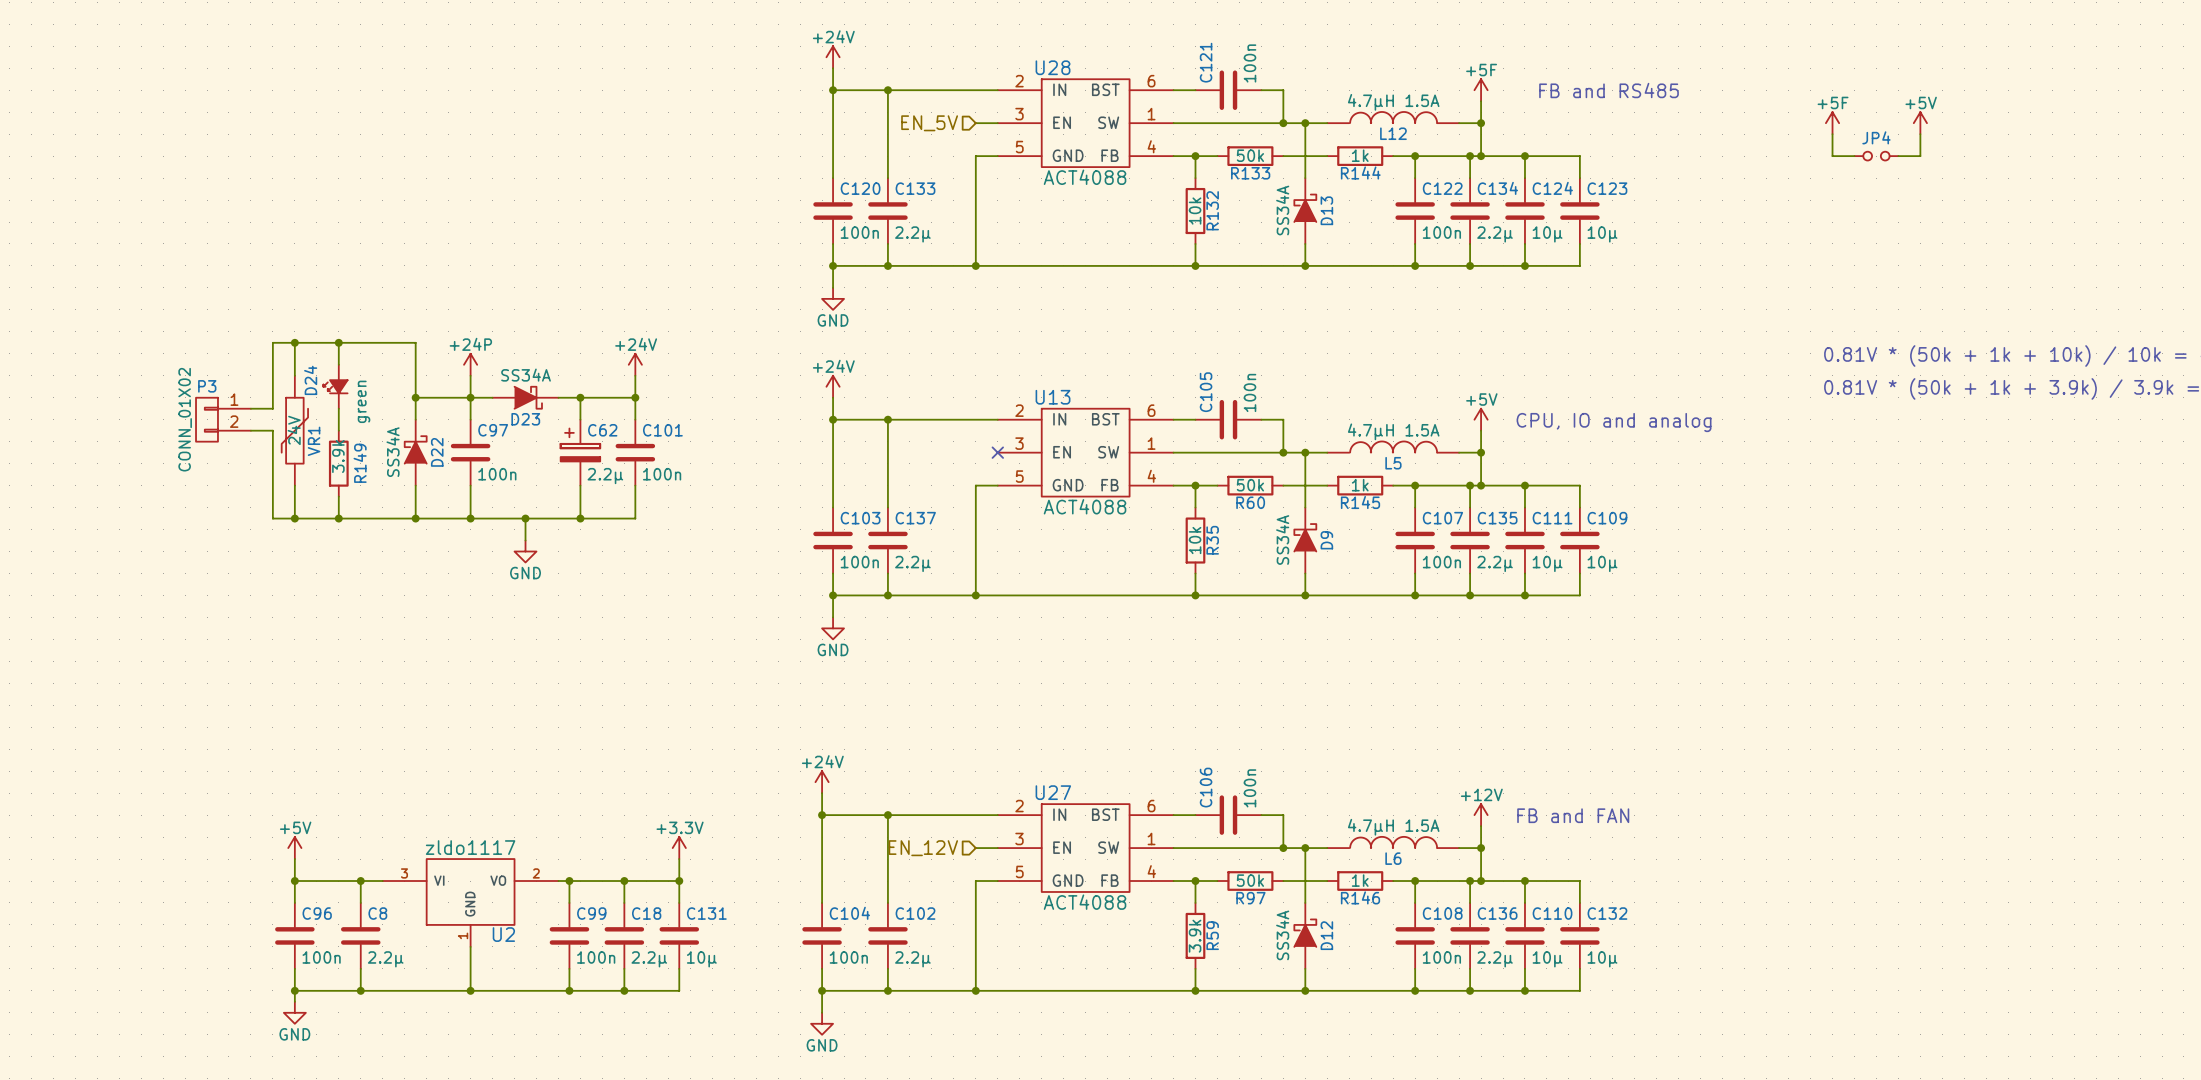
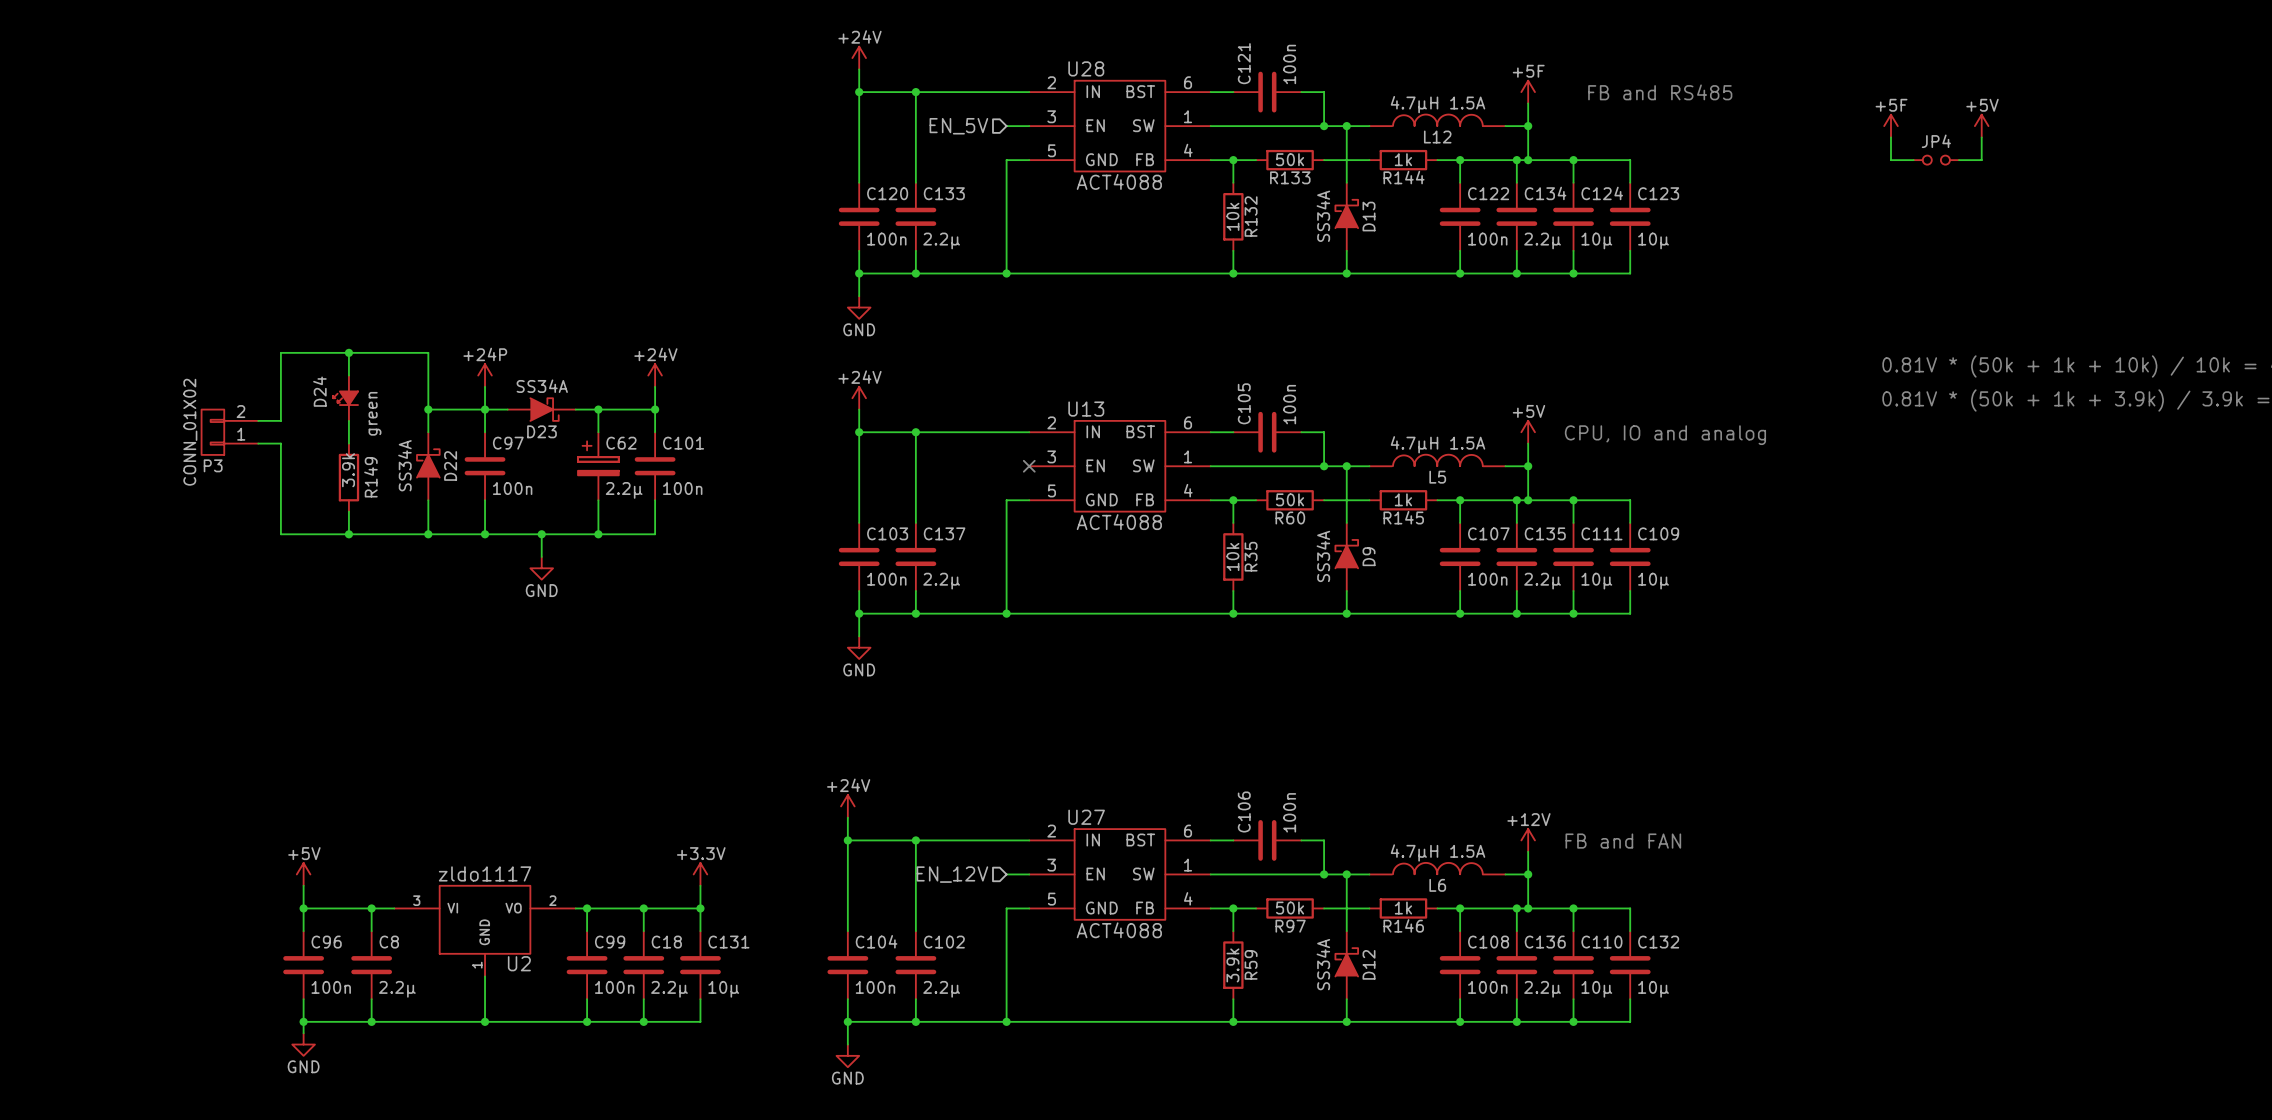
wire: (294, 342) (294, 375) -> none
junction: (294, 342) -> none
P3 flip: as is (207, 419) -> up-down (212, 432)
VR1: 24V (294, 430) -> none
wire: (294, 485) (294, 518) -> none
junction: (294, 518) -> none

